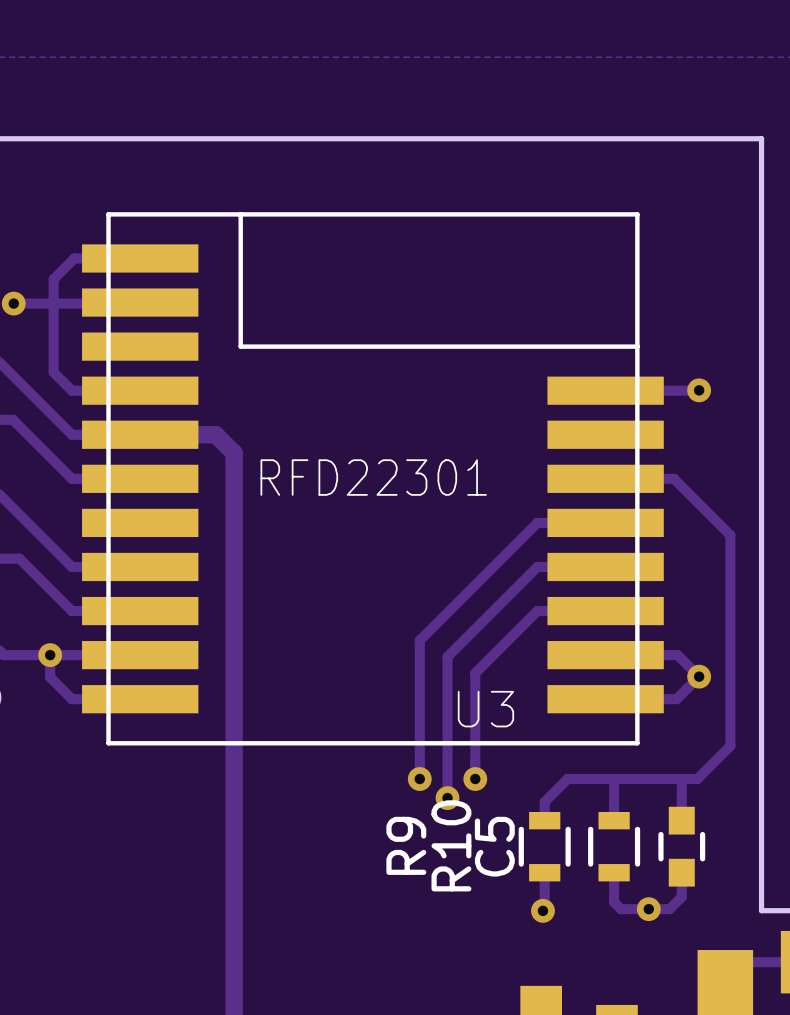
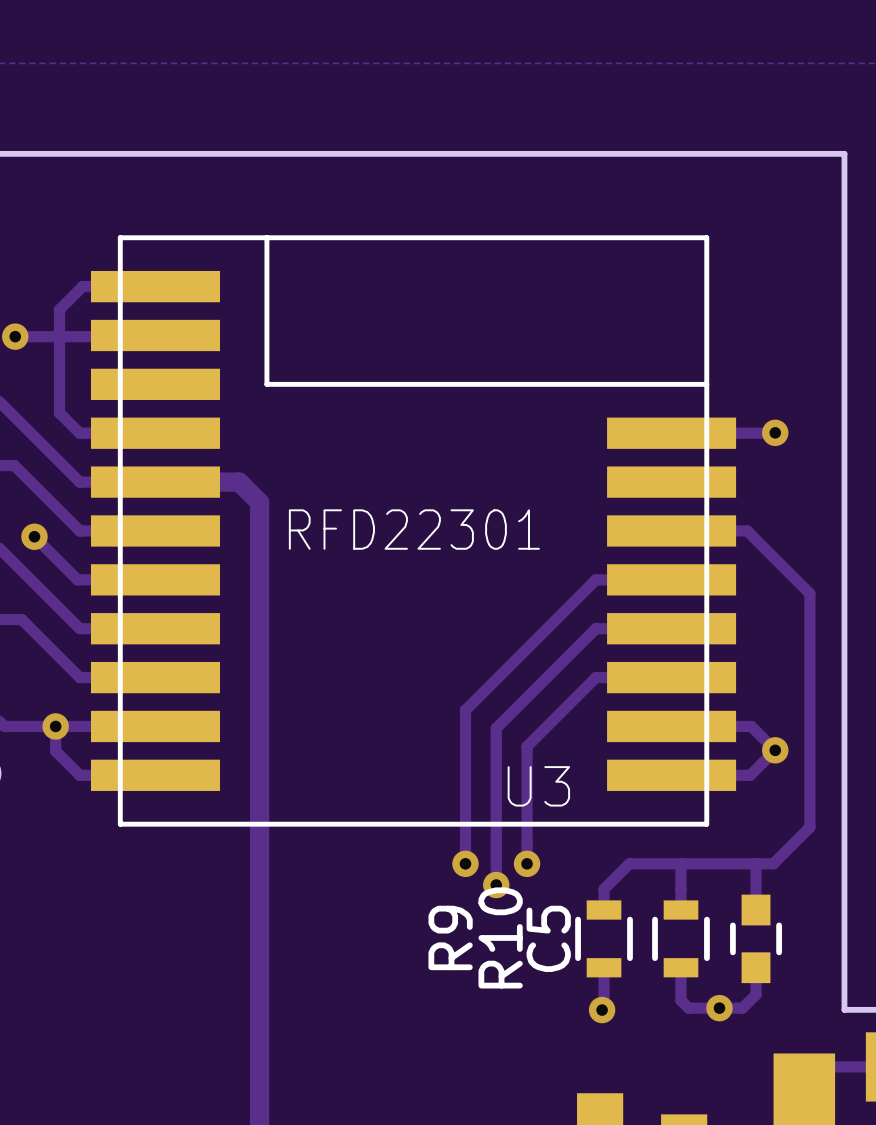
track: none -> (34, 536) (77, 579) (155, 579)
via: none -> (34, 536)

